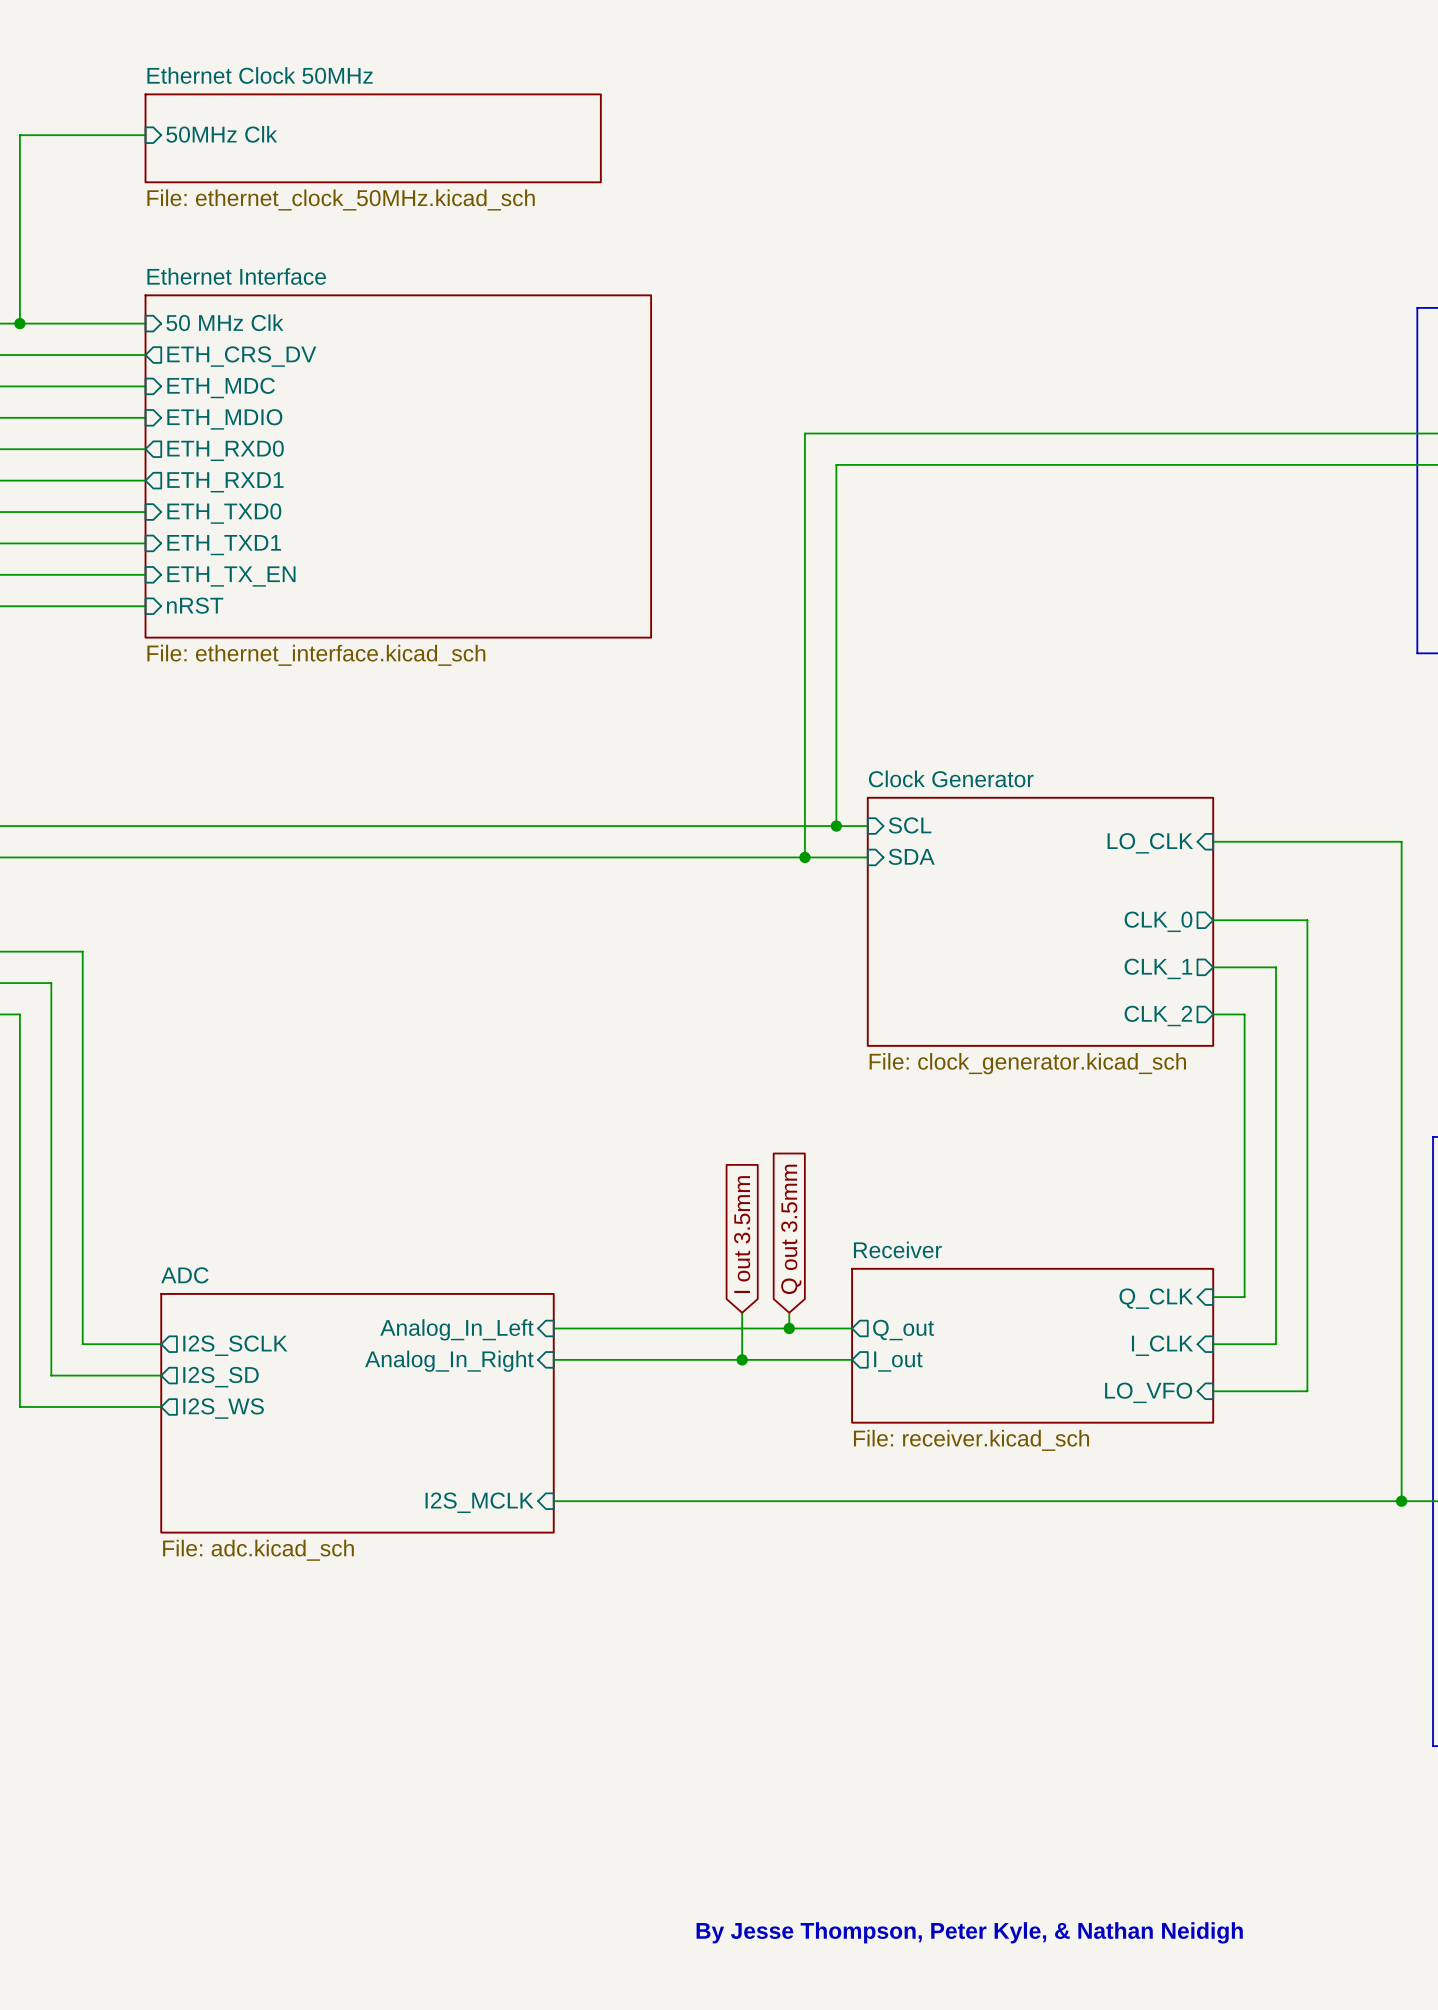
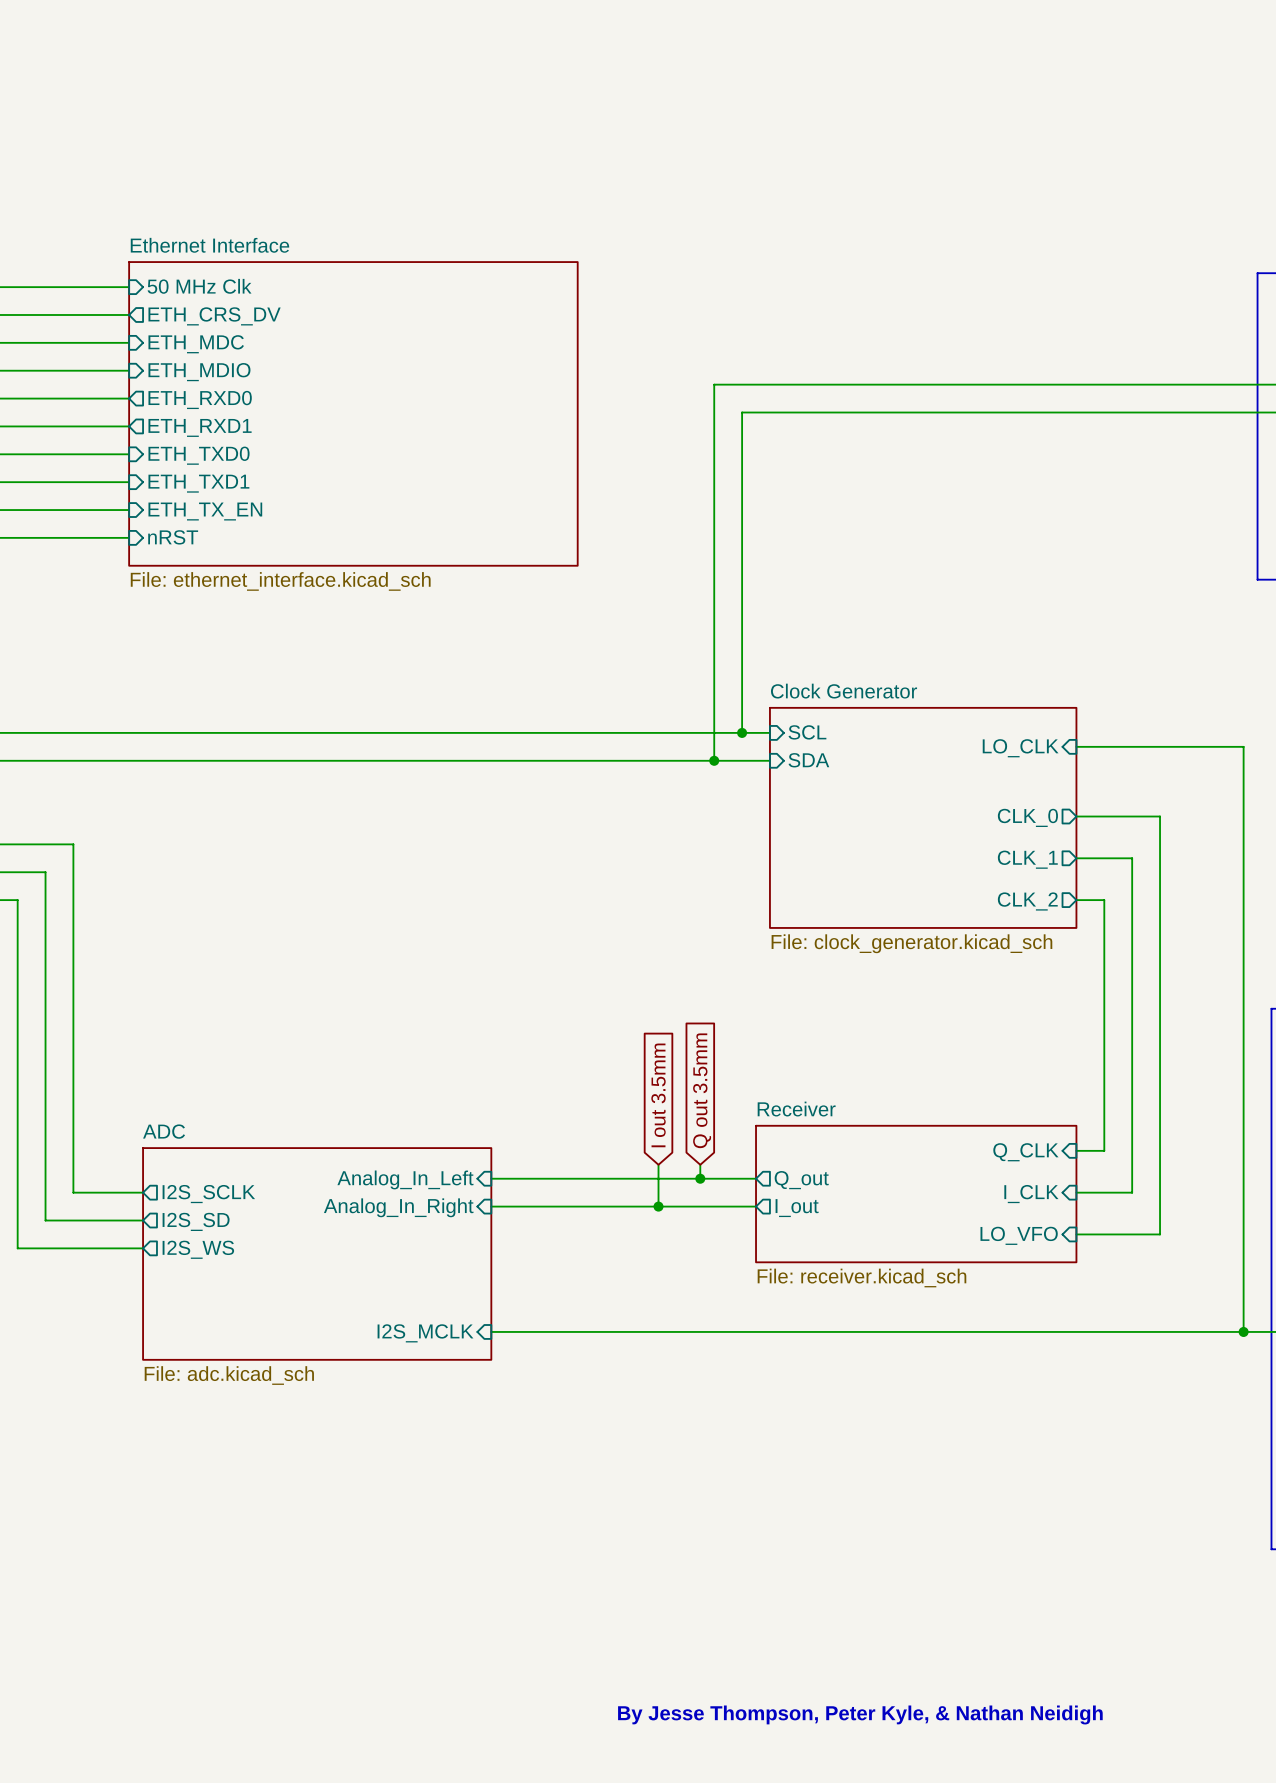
sheet pin: 50MHz Clk (221, 134) -> none
wire: (145, 135) (19, 135) (19, 323) -> none
sheet Ethernet Clock 50MHz: File: ethernet_clock_50MHz.kicad_sch (373, 138) -> none
junction: (19, 323) -> none

